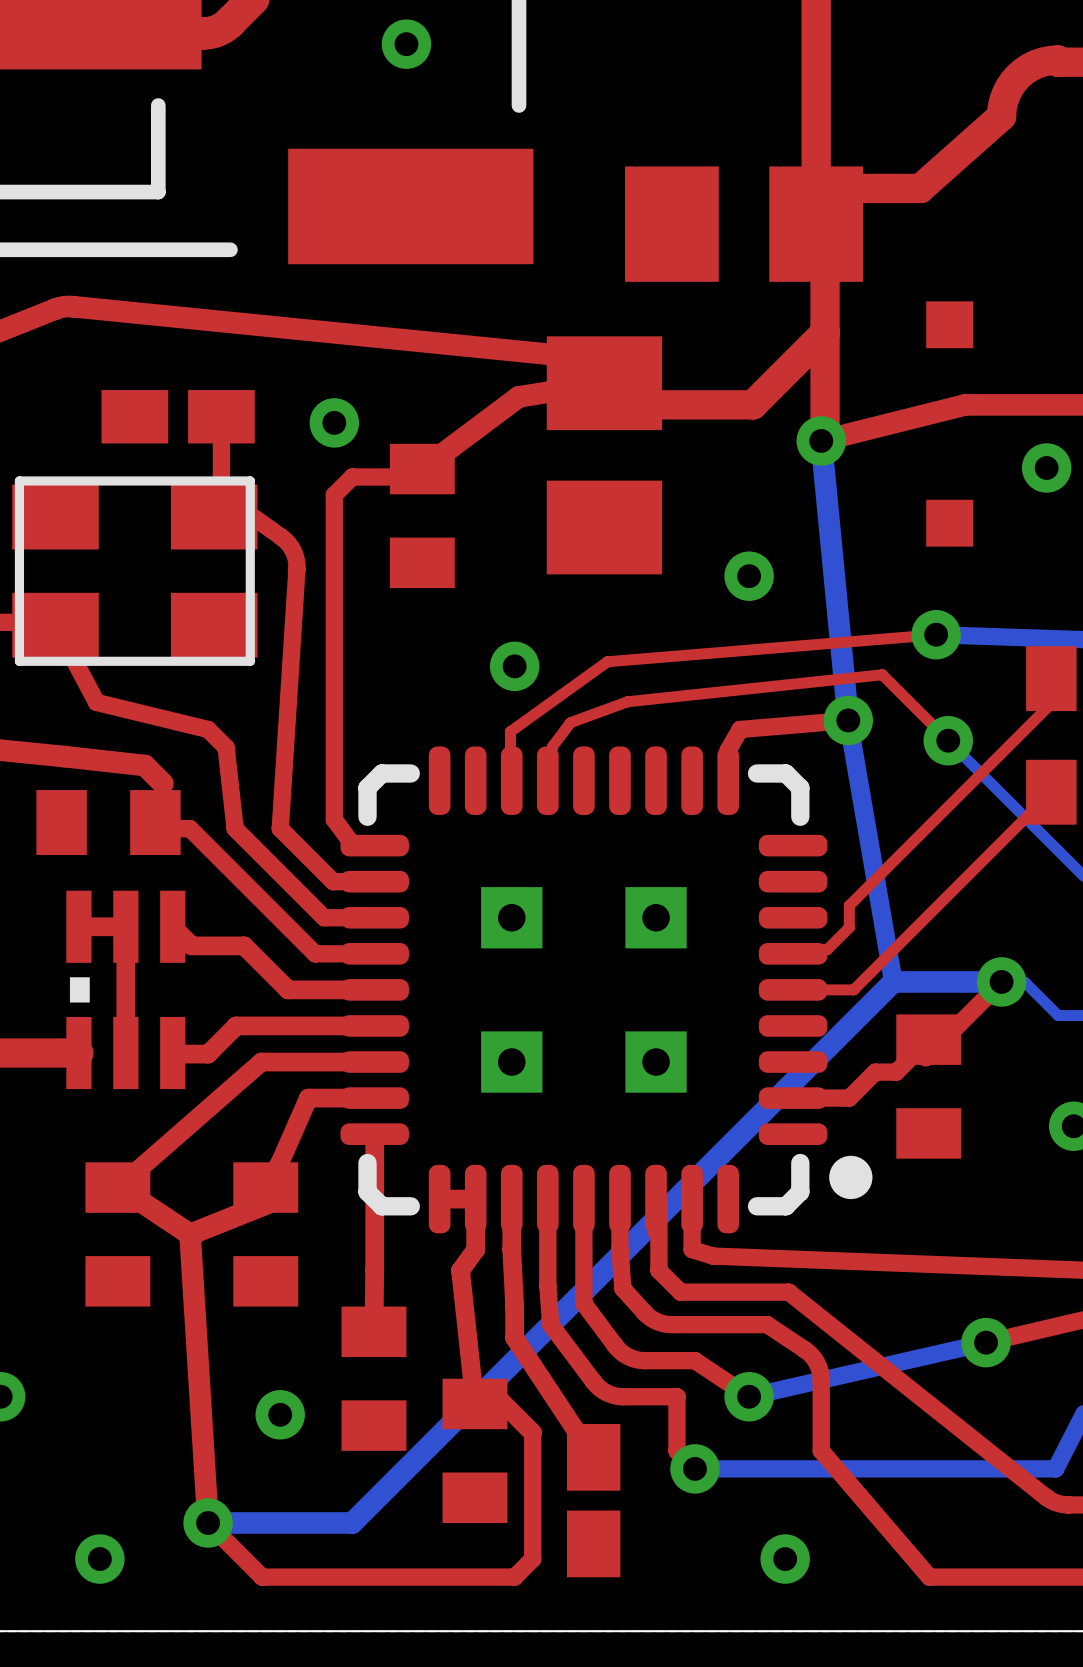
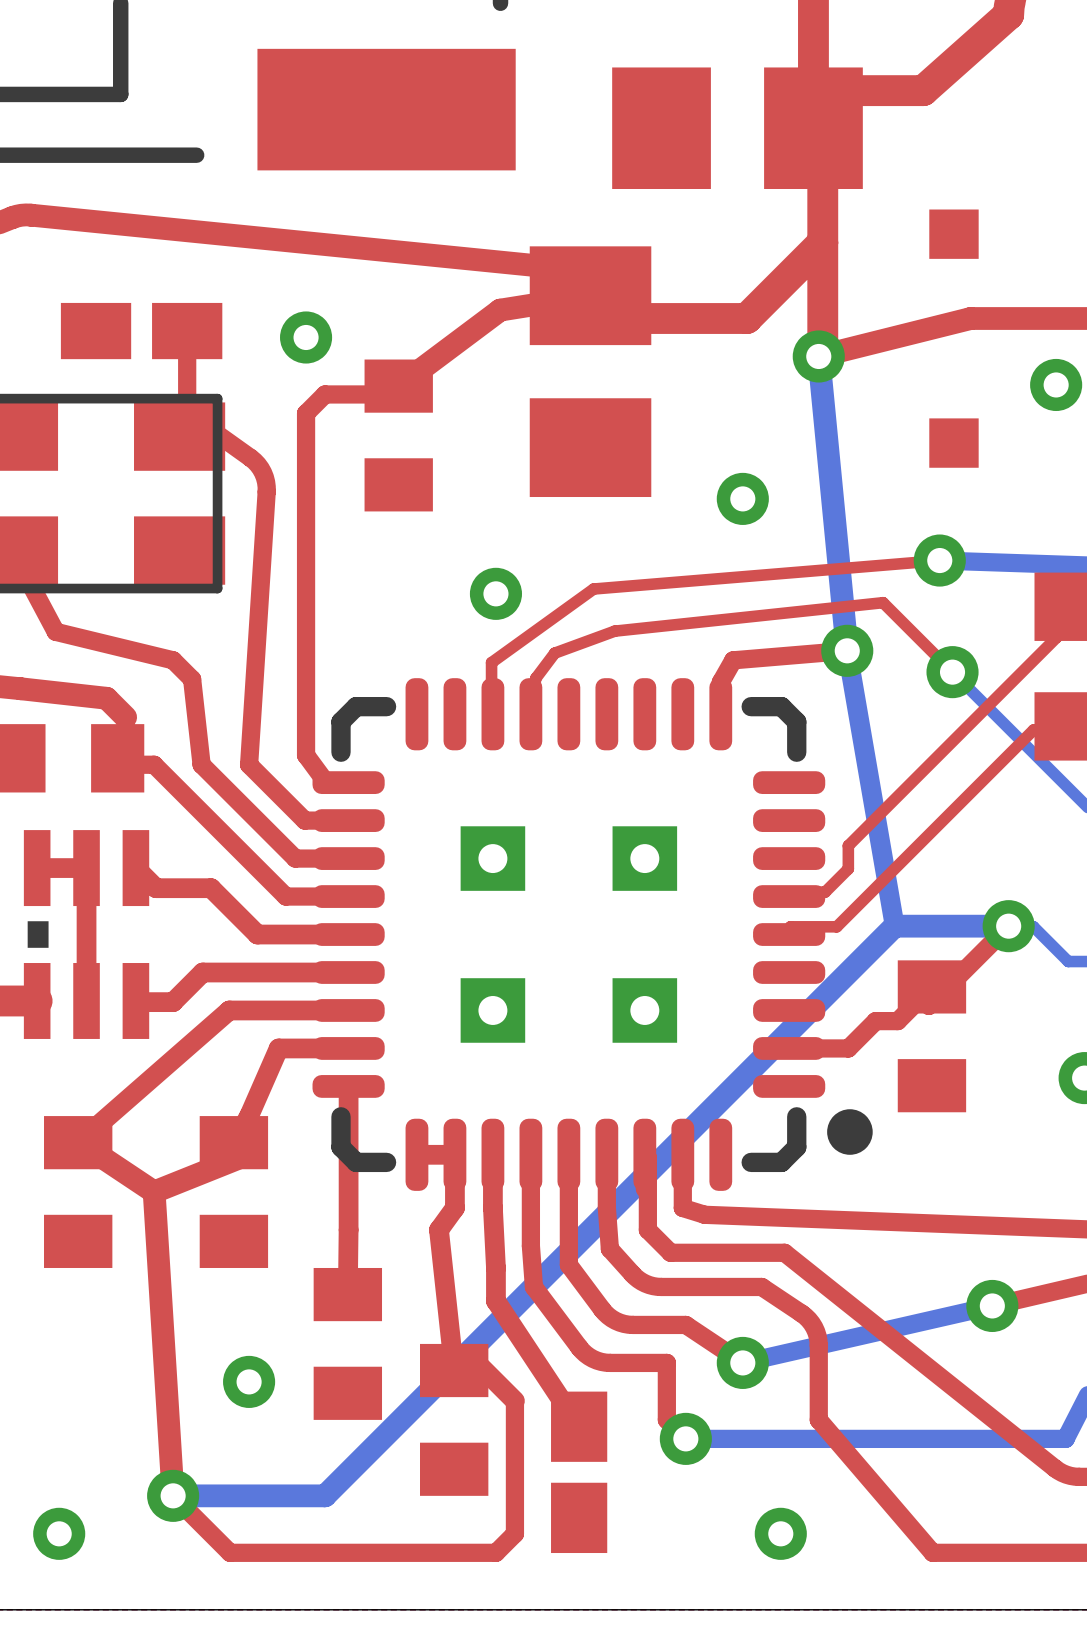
top track: (1051, 792) (853, 989) (793, 989) -> (1061, 726) (1056, 730) (1033, 730) (836, 926) (790, 926) (789, 934)

